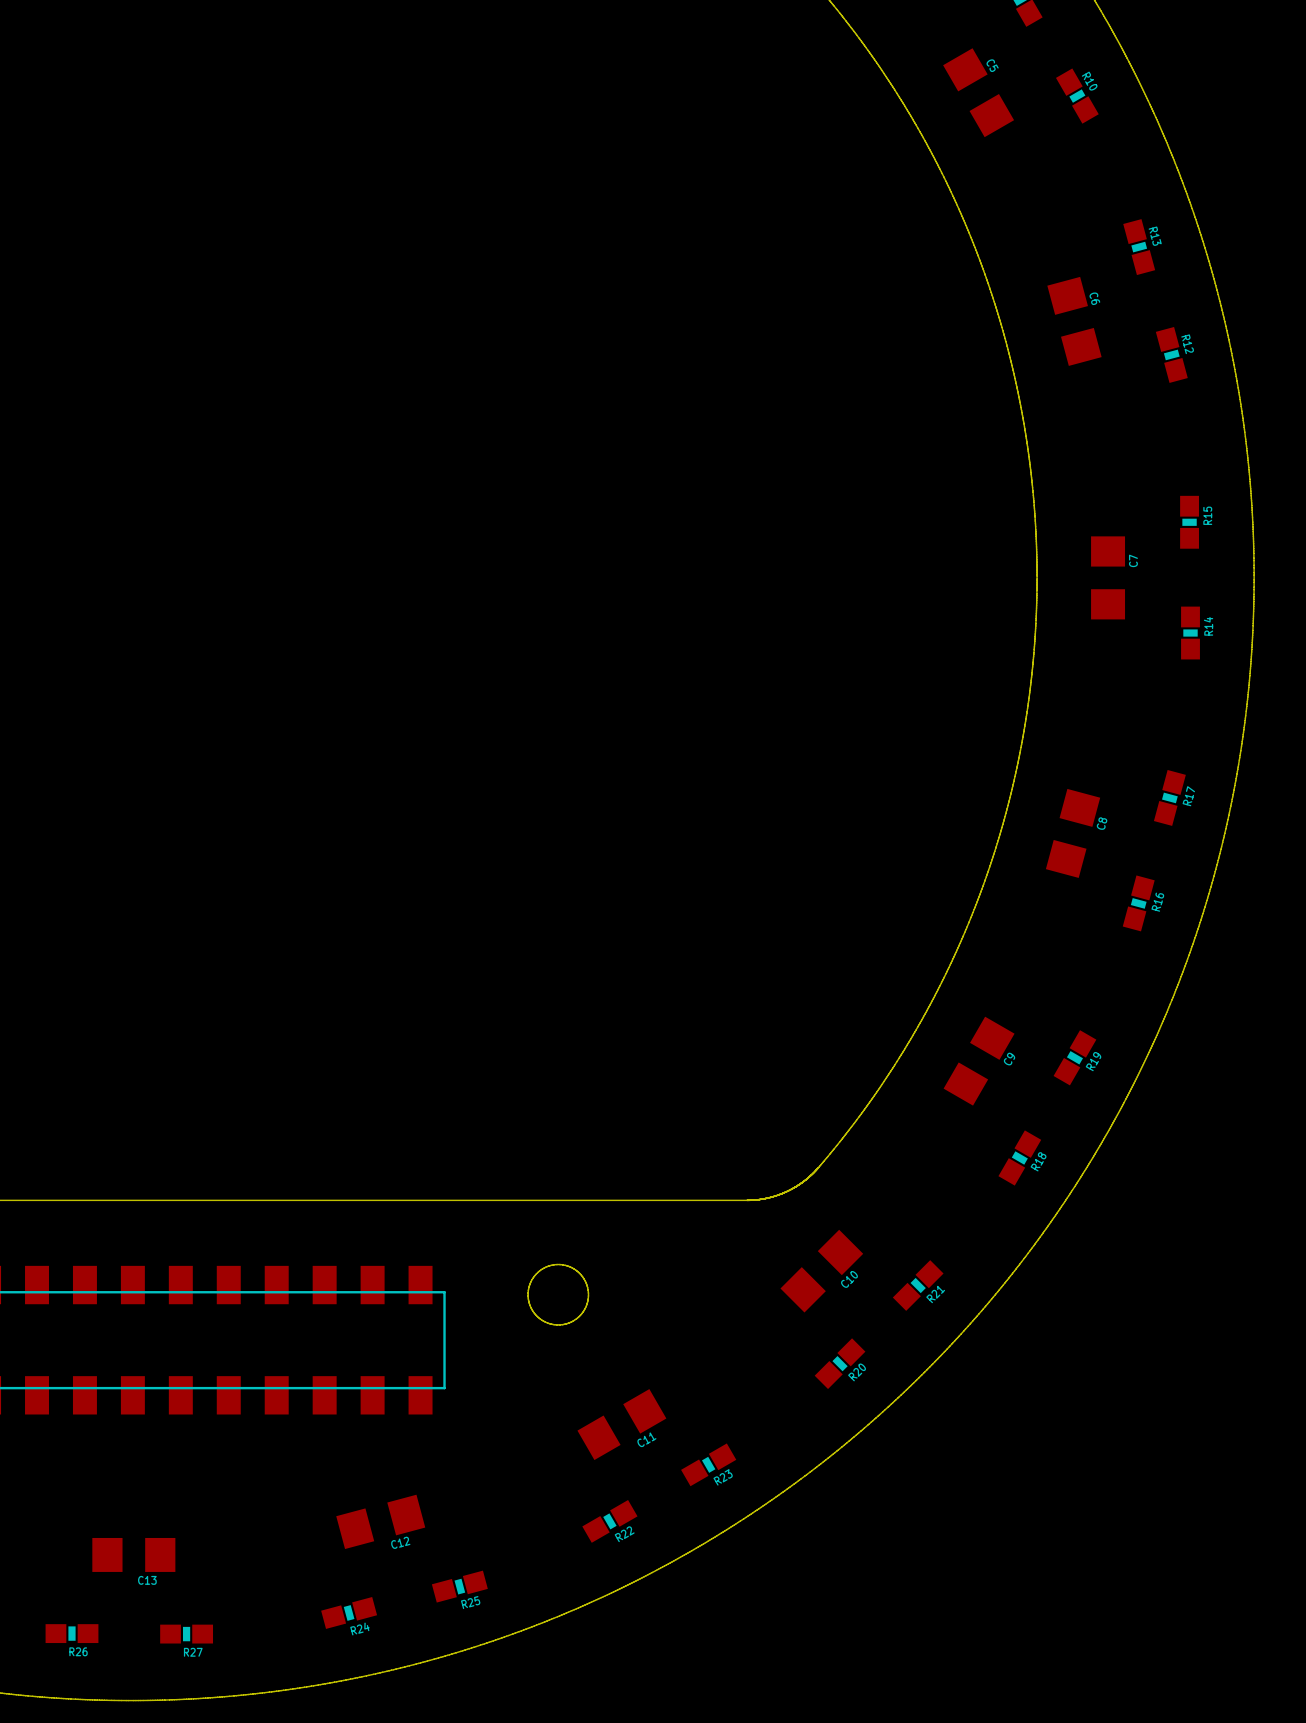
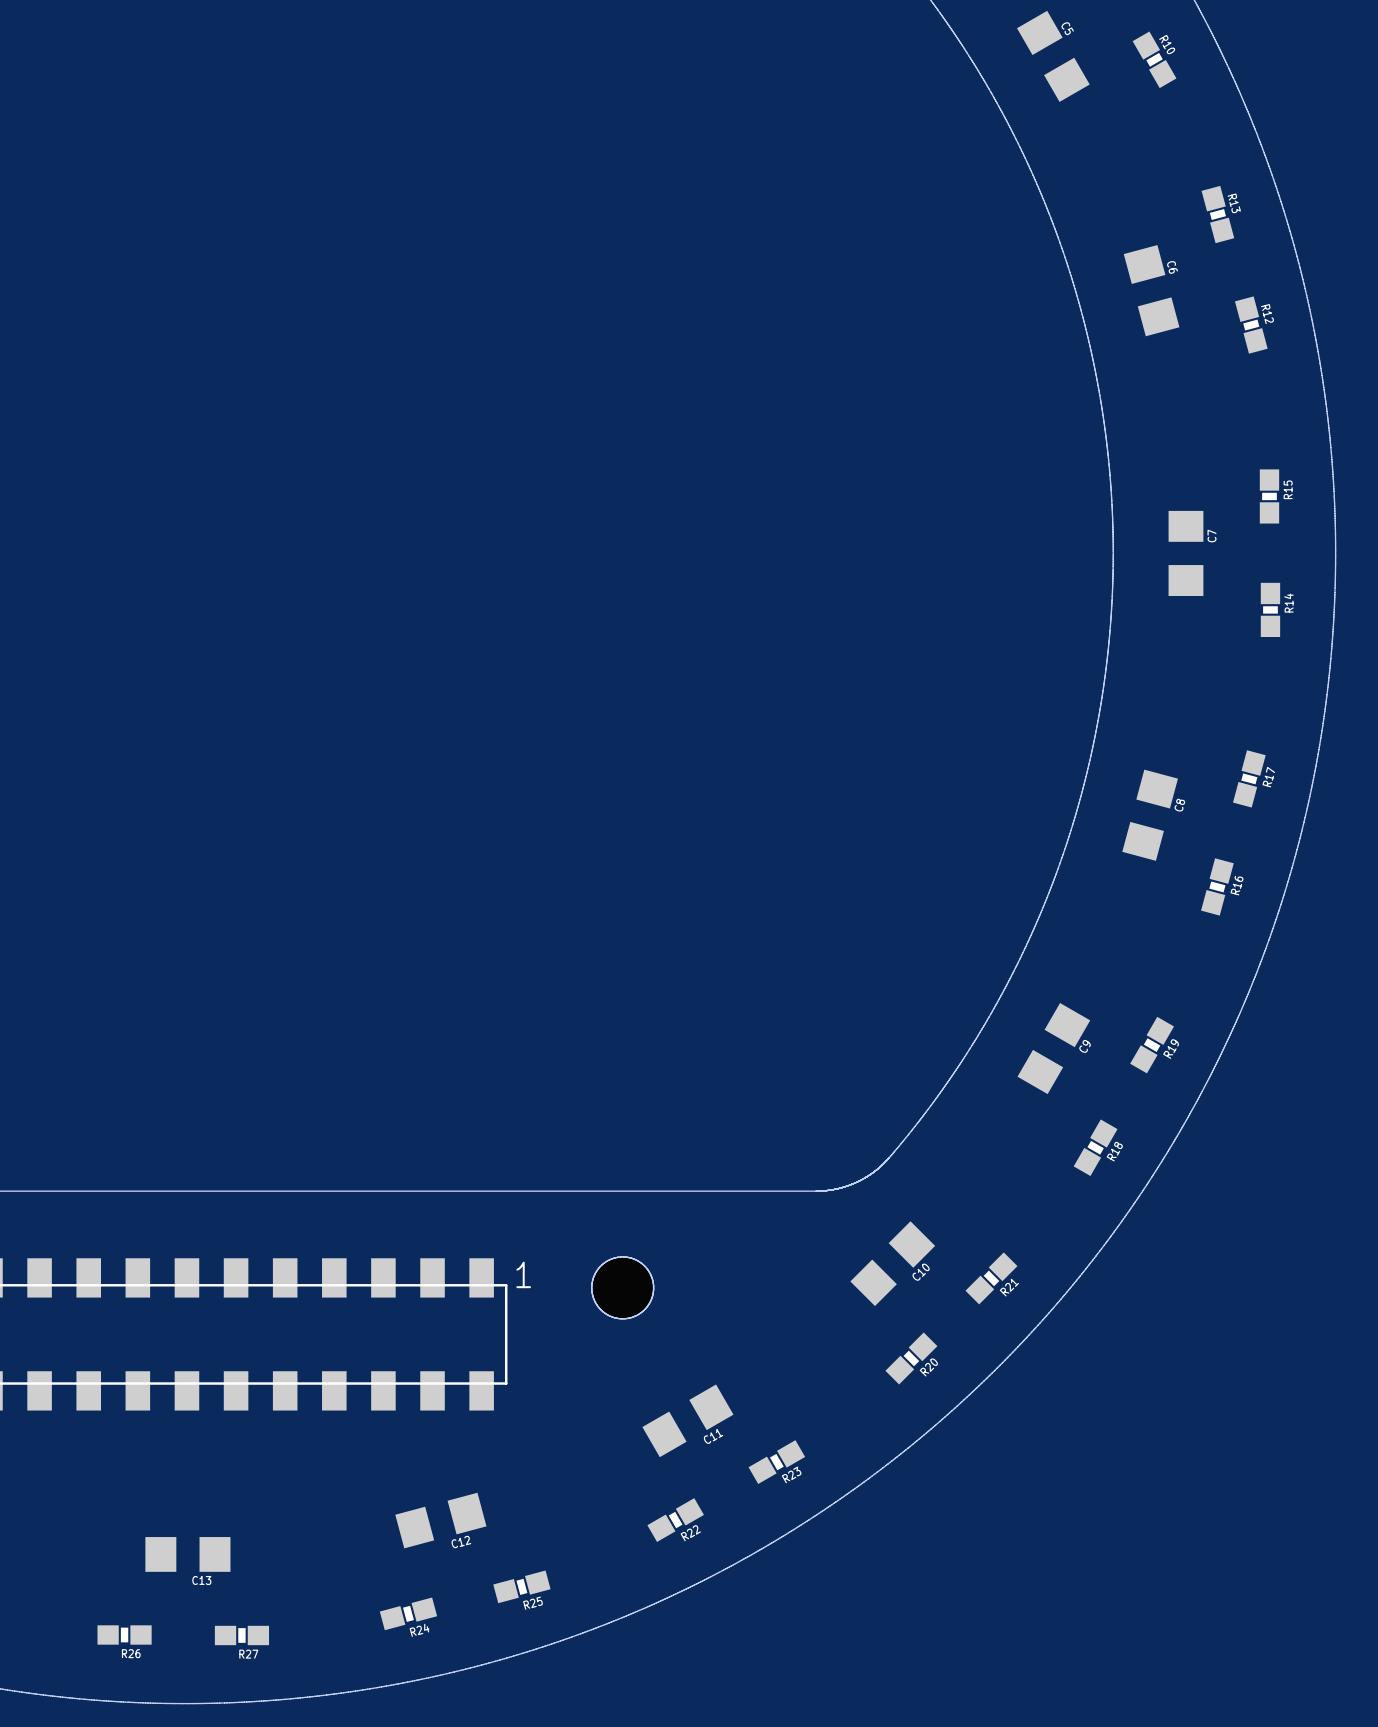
text: none -> 1 (523, 1274)
hole: none -> (622, 1287)

